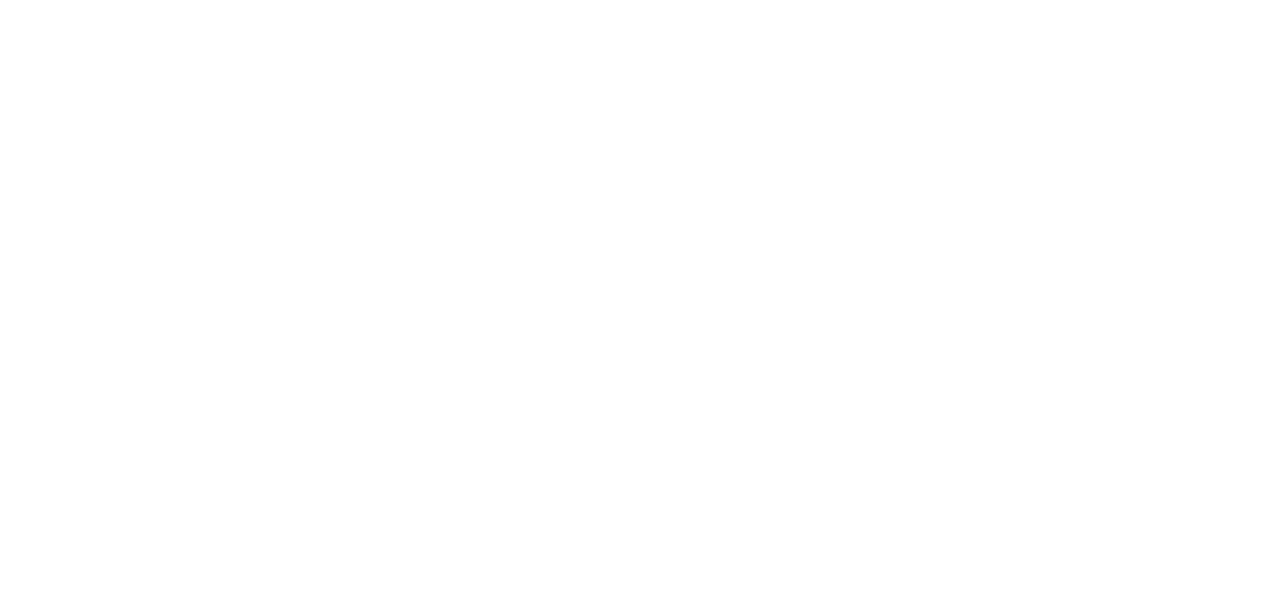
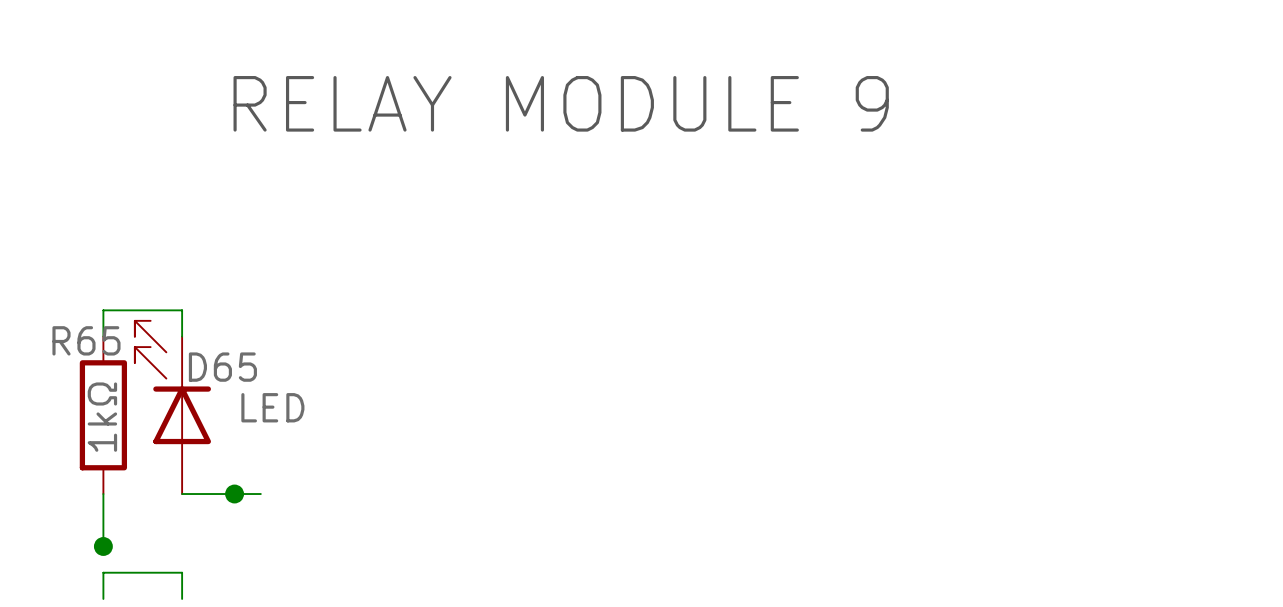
text: none -> RELAY MODULE 9 (561, 103)
wire: none -> (103, 336) (103, 310) (182, 310) (182, 336)
D65: none -> LED (172, 407)
R65: none -> 1kΩ (103, 415)
wire: none -> (103, 494) (103, 546)
wire: none -> (182, 494) (260, 494)
junction: none -> (234, 494)
junction: none -> (103, 546)
wire: none -> (103, 598) (103, 572) (182, 572) (182, 598)

